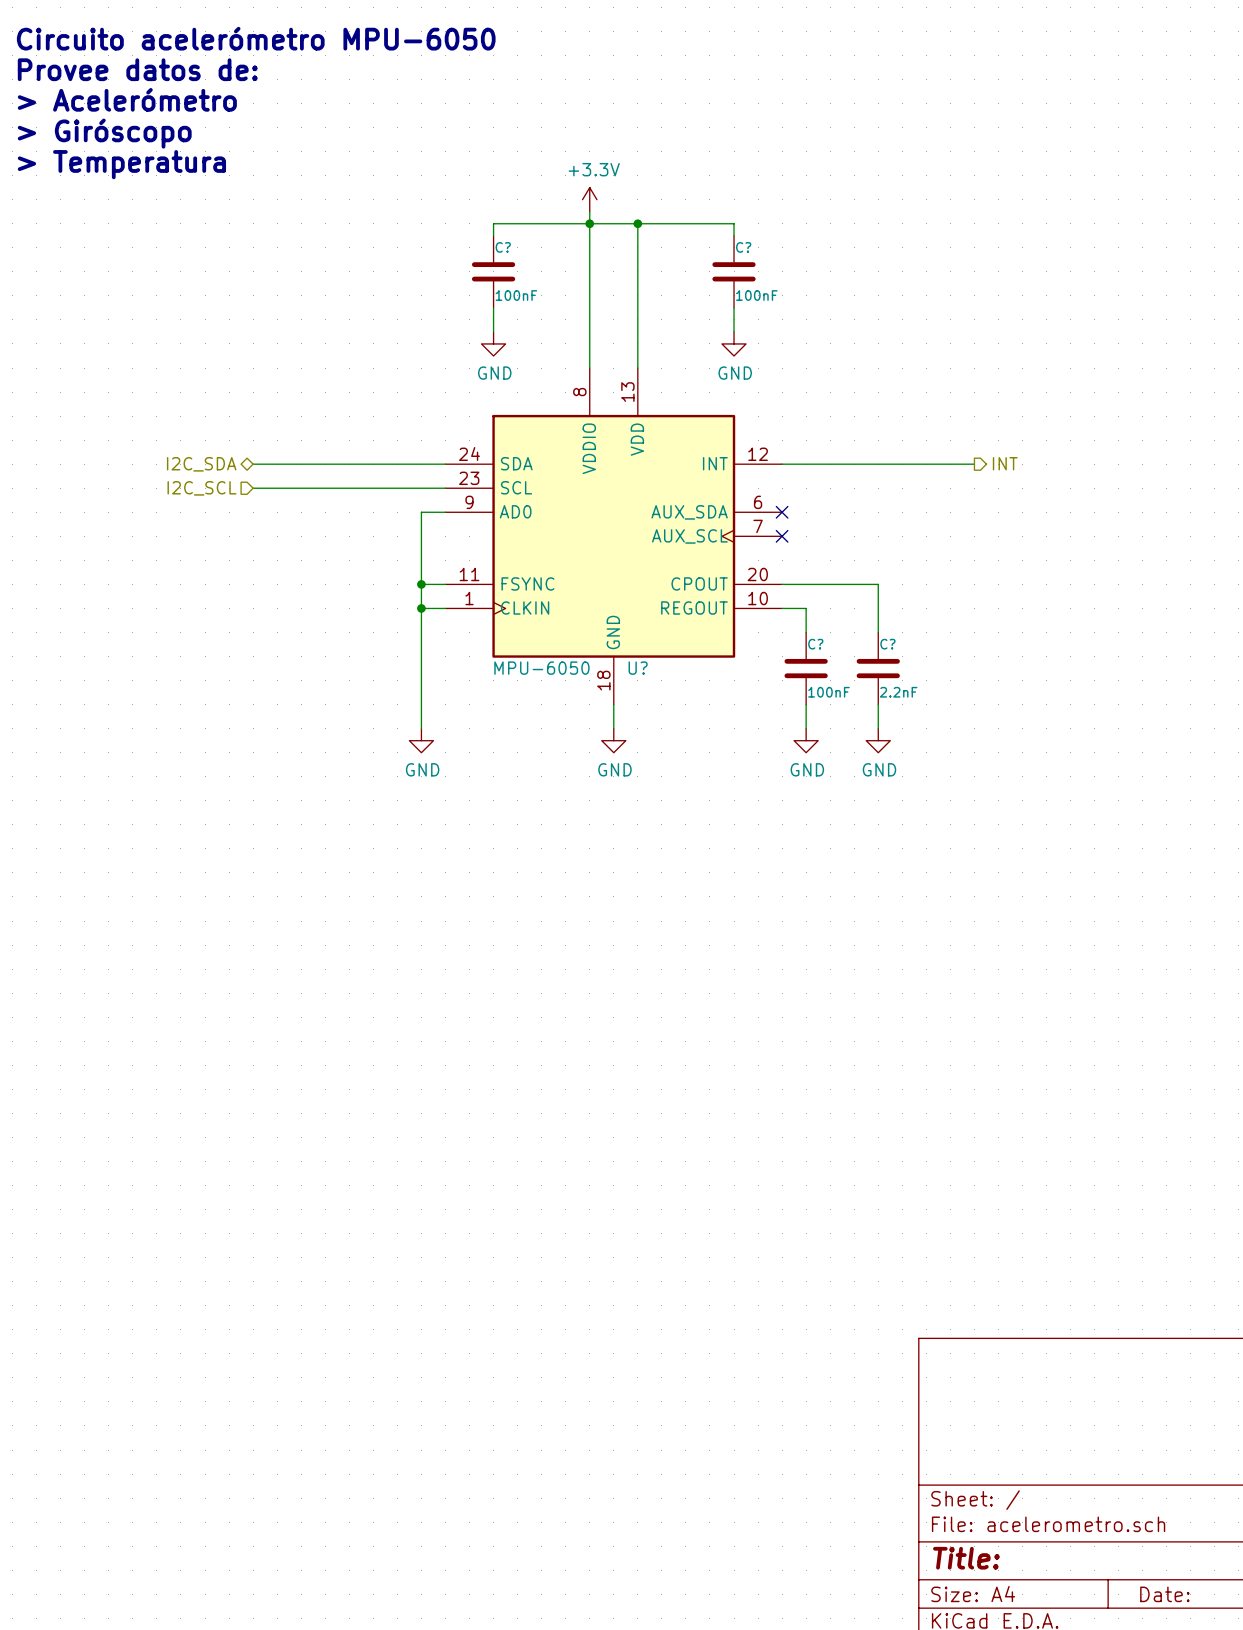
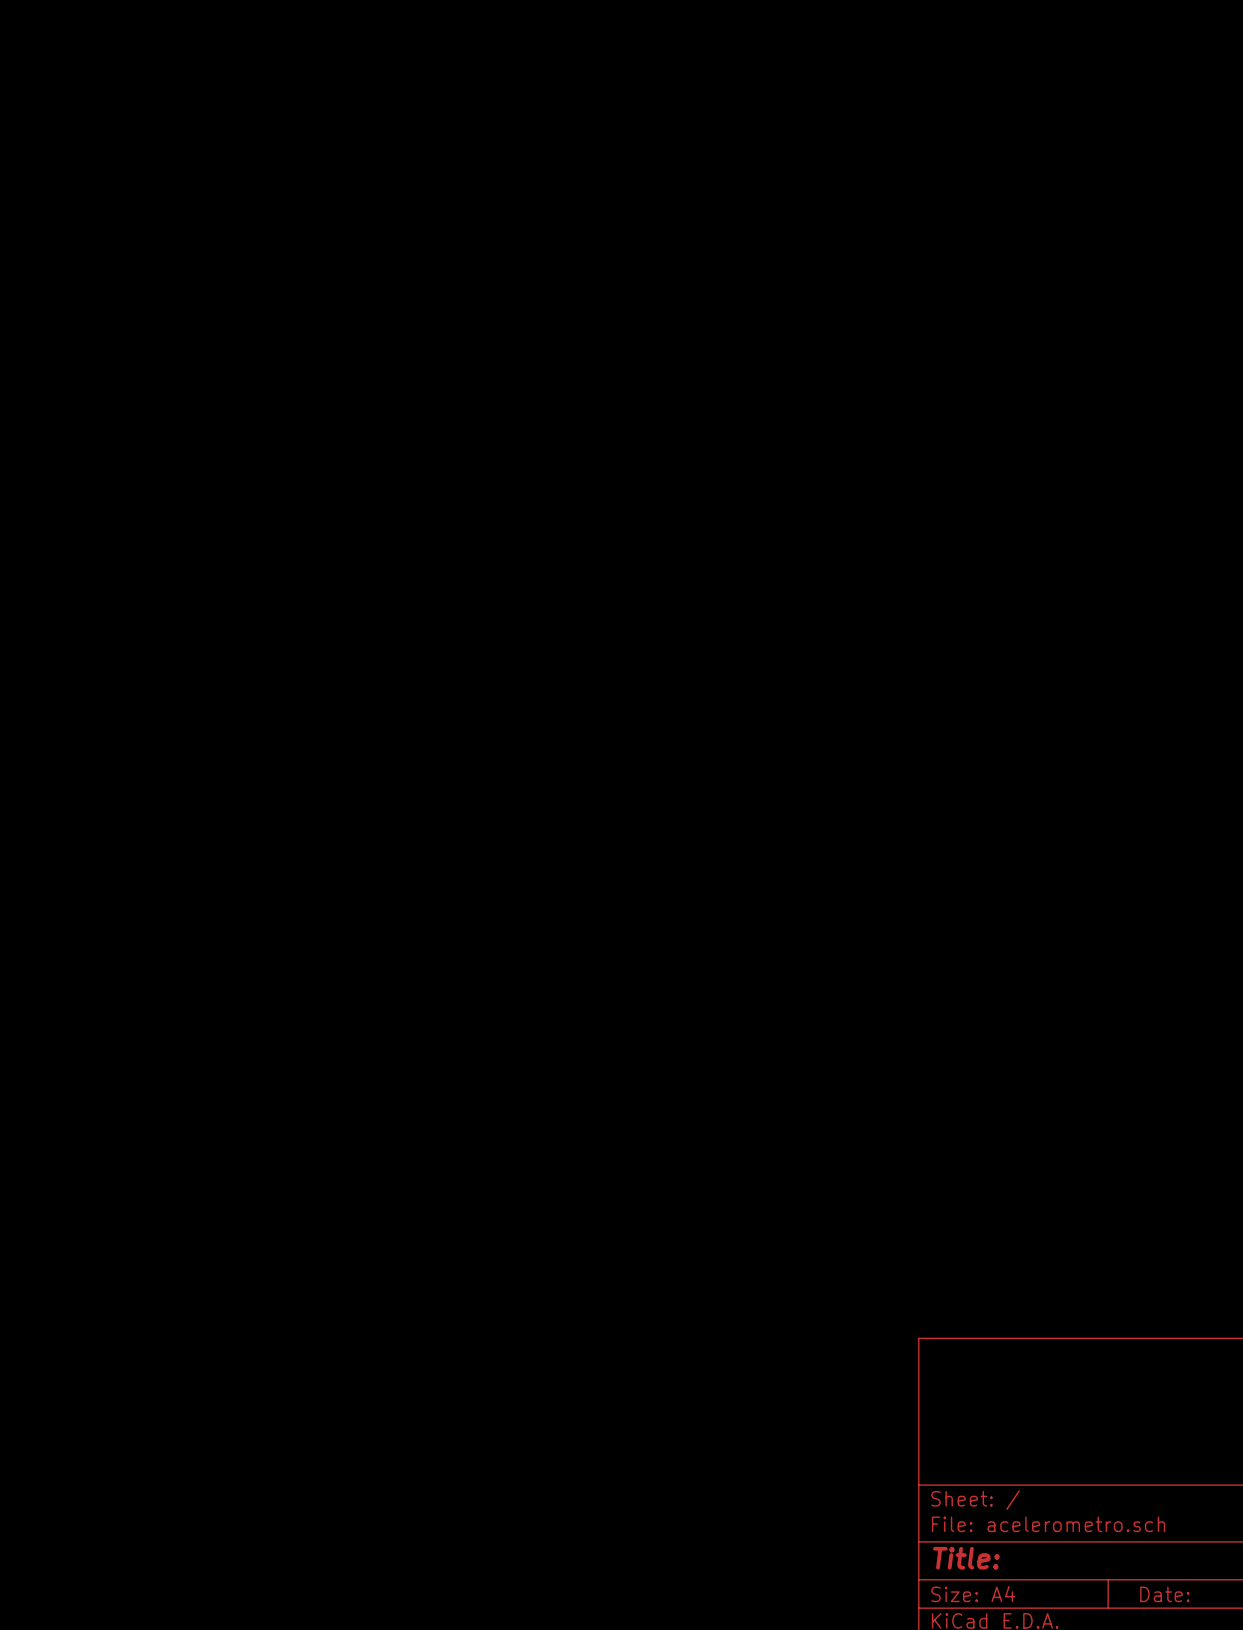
text: Circuito acelerómetro MPU-6050 (256, 38) -> none
text: Provee datos de: (137, 69) -> none
text: > Acelerómetro (127, 99) -> none
text: > Giróscopo (104, 133) -> none
text: > Temperatura (121, 164) -> none
power symbol: +3.3V (589, 199) -> none
wire: (589, 211) (589, 368) -> none
junction: (589, 223) -> none
wire: (637, 223) (637, 368) -> none
junction: (637, 223) -> none
wire: (493, 235) (493, 223) (734, 223) (734, 235) -> none
C?: 100nF (493, 271) -> none
C?: 100nF (734, 271) -> none
wire: (493, 307) (493, 331) -> none
wire: (734, 307) (734, 331) -> none
power symbol: GND (493, 343) -> none
power symbol: GND (734, 343) -> none
hierarchical label: INT (1005, 463) -> none
hierarchical label: I2C_SDA (201, 464) -> none
wire: (253, 464) (445, 464) -> none
wire: (782, 464) (974, 464) -> none
hierarchical label: I2C_SCL (201, 488) -> none
wire: (253, 488) (445, 488) -> none
wire: (445, 512) (421, 512) (421, 728) -> none
no-connect mark: (782, 512) -> none
U?: MPU-6050 (613, 536) -> none
no-connect mark: (782, 536) -> none
wire: (421, 584) (445, 584) -> none
junction: (421, 584) -> none
wire: (782, 584) (878, 584) (878, 632) -> none
wire: (421, 608) (445, 608) -> none
junction: (421, 608) -> none
wire: (782, 608) (806, 608) (806, 632) -> none
C?: 100nF (806, 668) -> none
C?: 2.2nF (878, 668) -> none
wire: (613, 704) (613, 728) -> none
wire: (806, 704) (806, 728) -> none
wire: (878, 704) (878, 728) -> none
power symbol: GND (421, 740) -> none
power symbol: GND (613, 740) -> none
power symbol: GND (806, 740) -> none
power symbol: GND (878, 740) -> none

